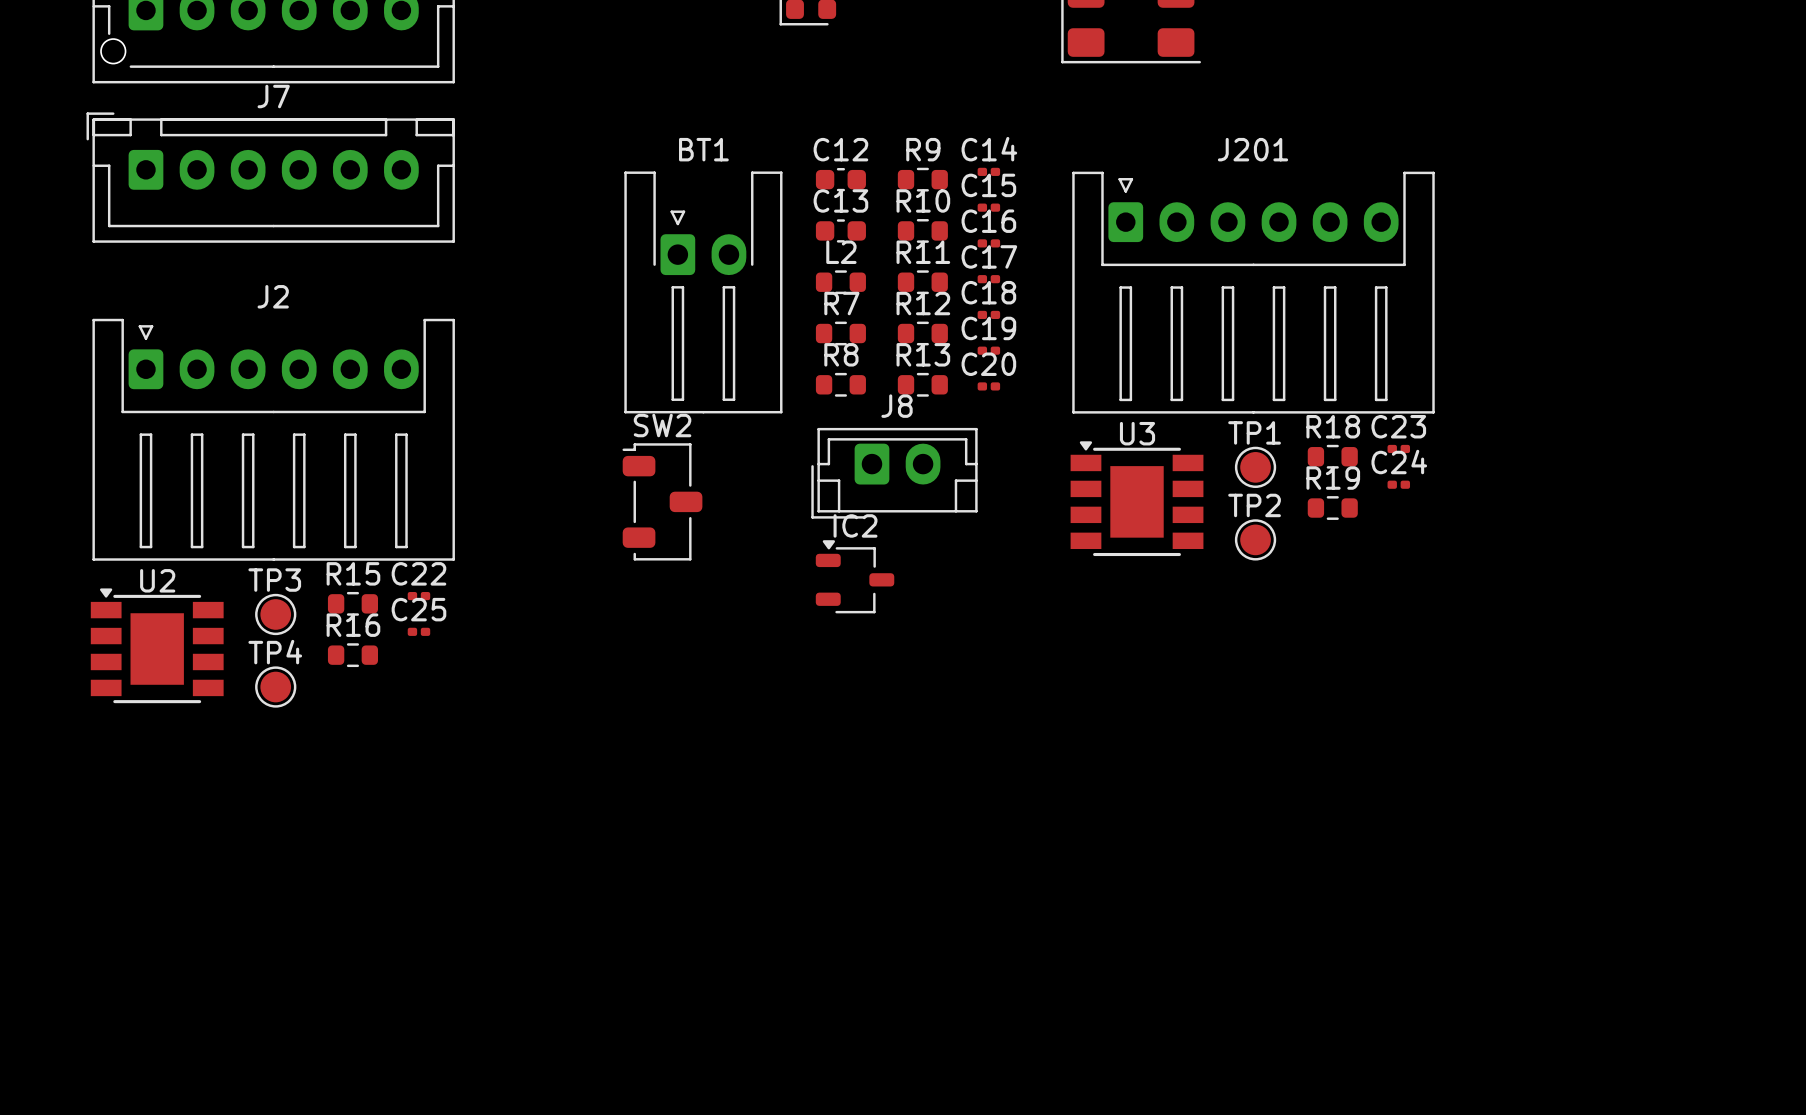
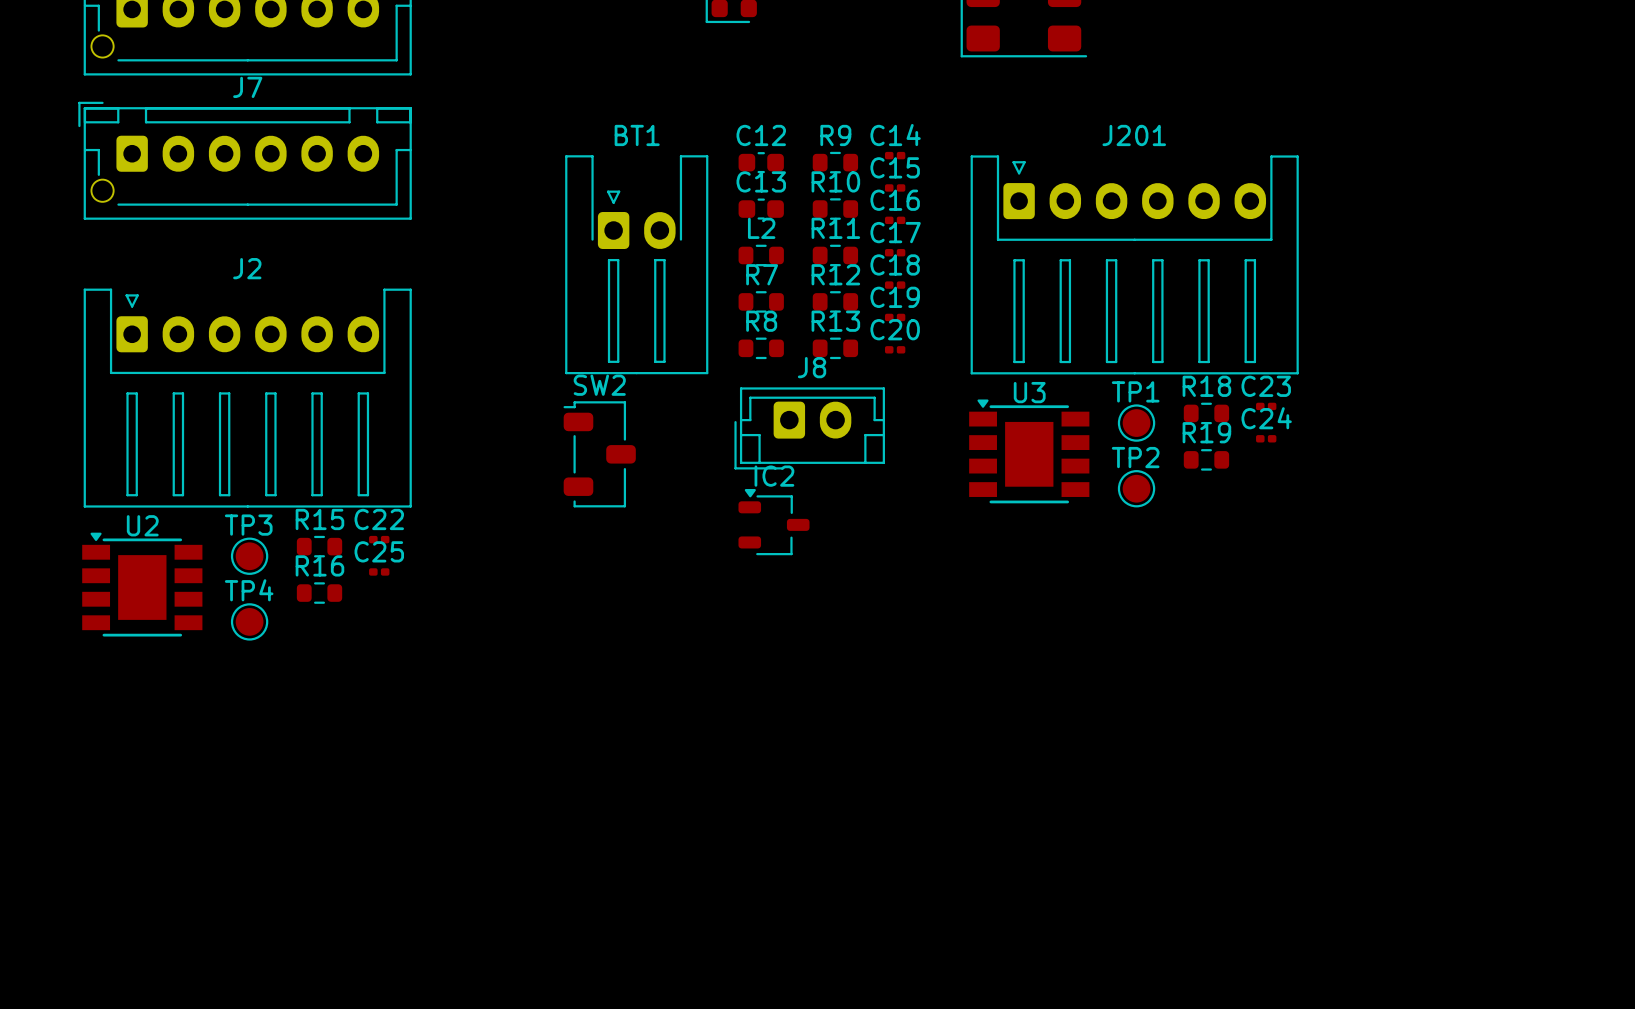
J7 footprint: [86, 112, 455, 243] -> [78, 101, 412, 220]

